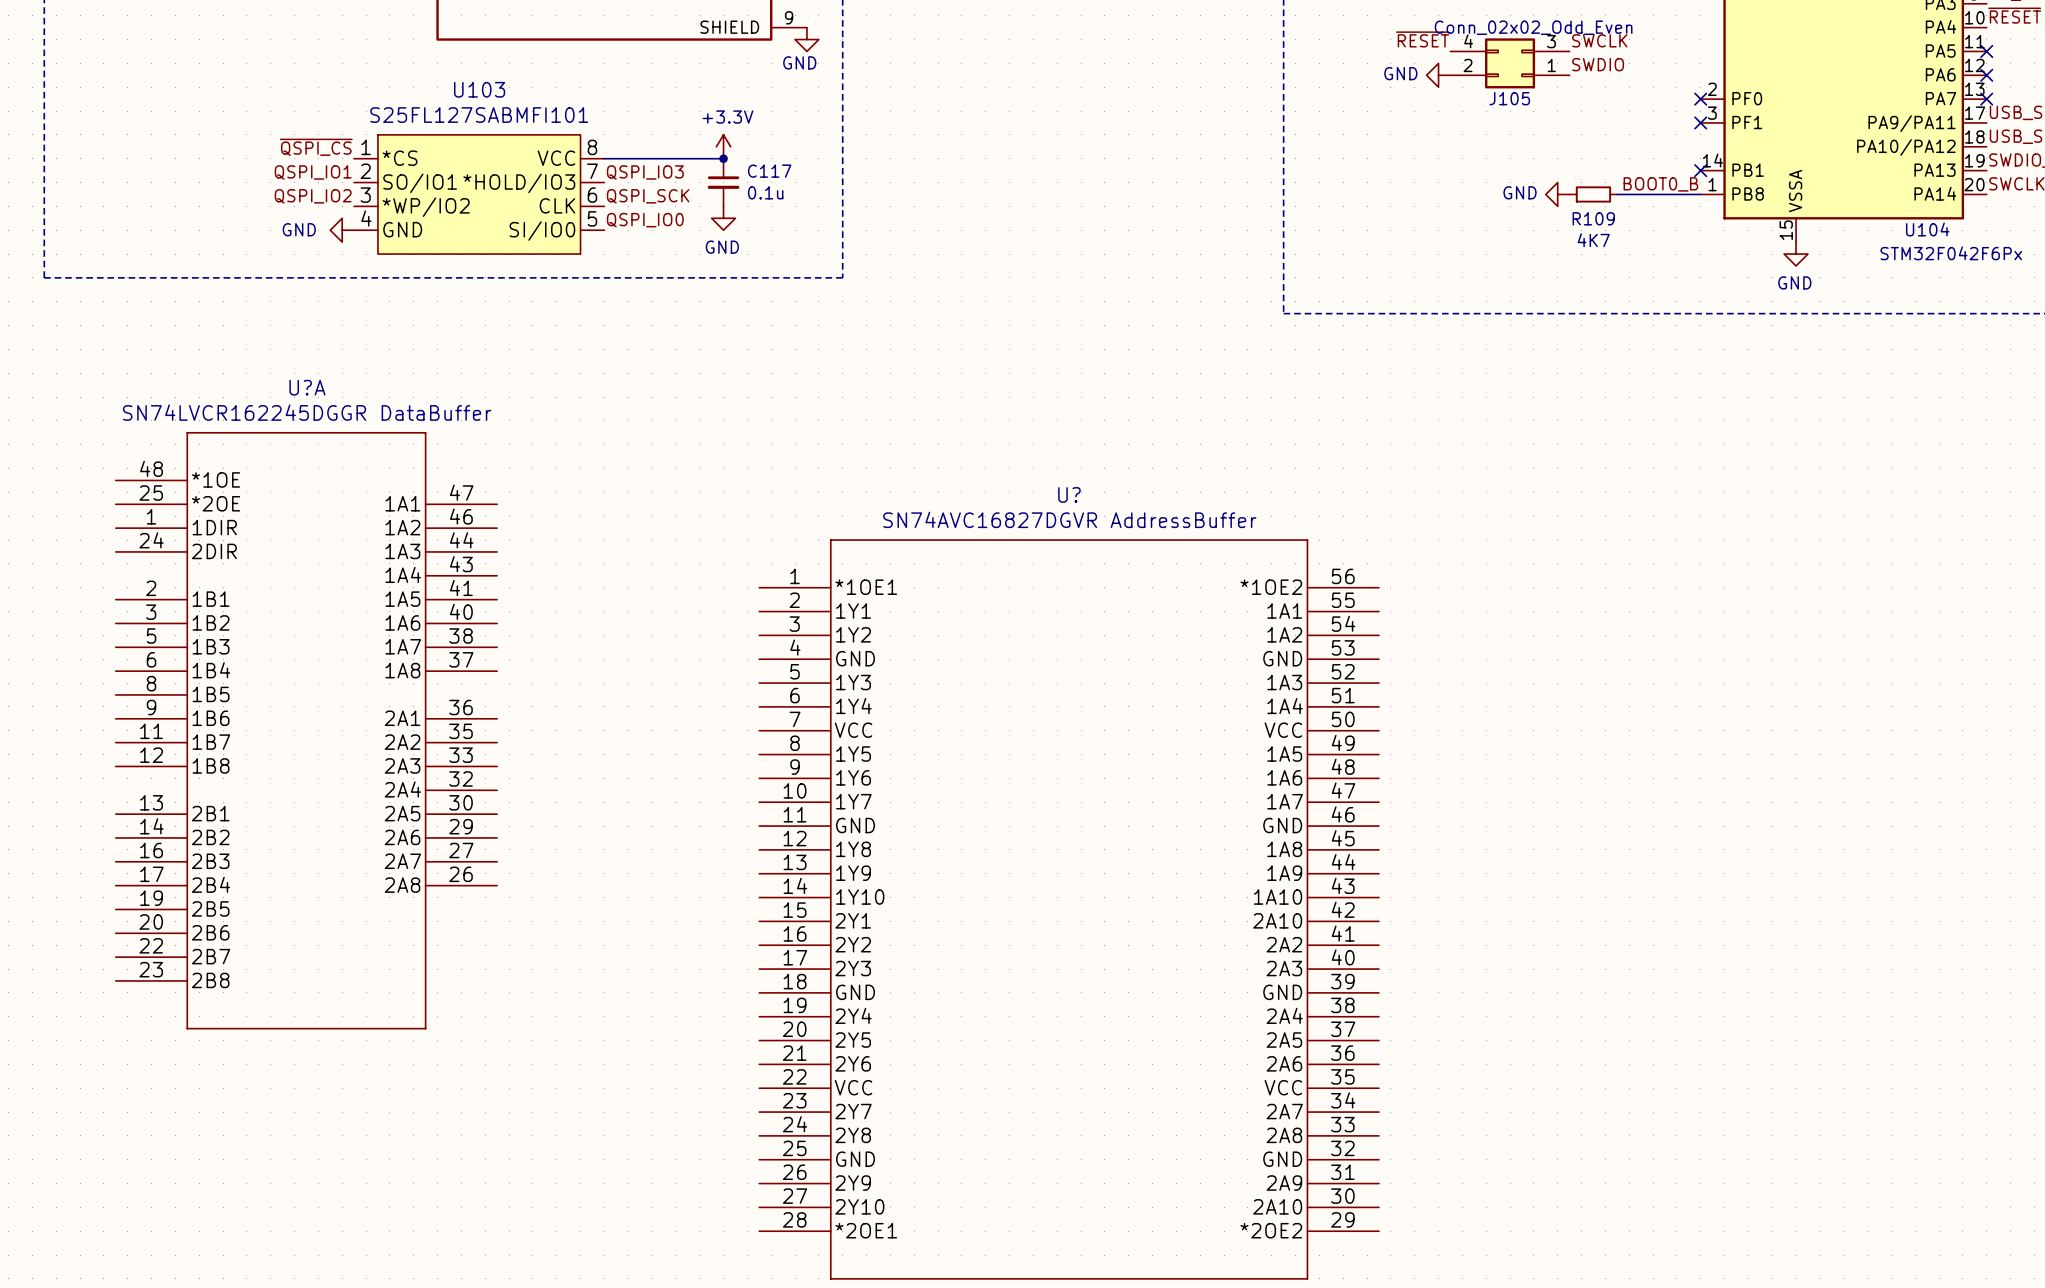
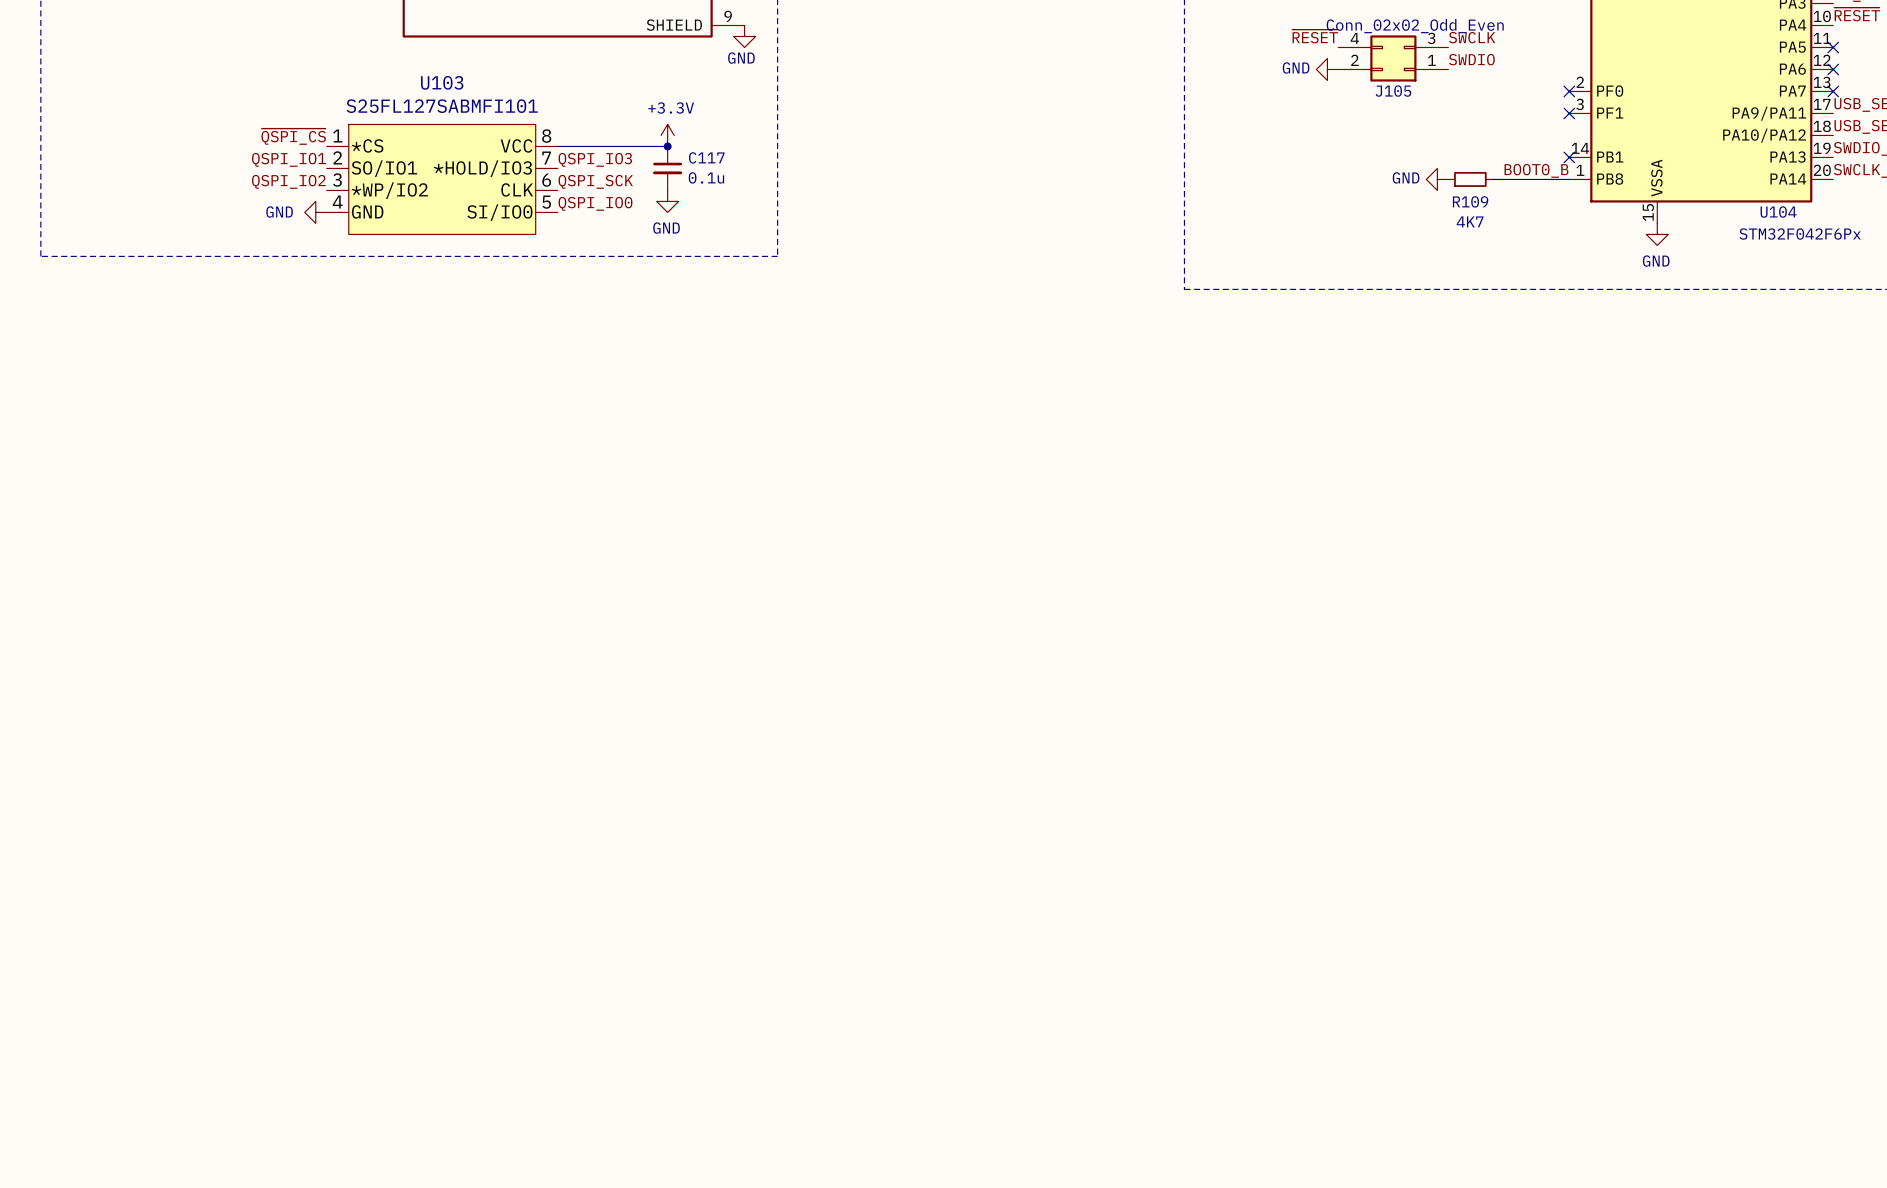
U?A: SN74LVCR162245DGGR DataBuffer (306, 730) -> none
U?: SN74AVC16827DGVR AddressBuffer (1069, 909) -> none

